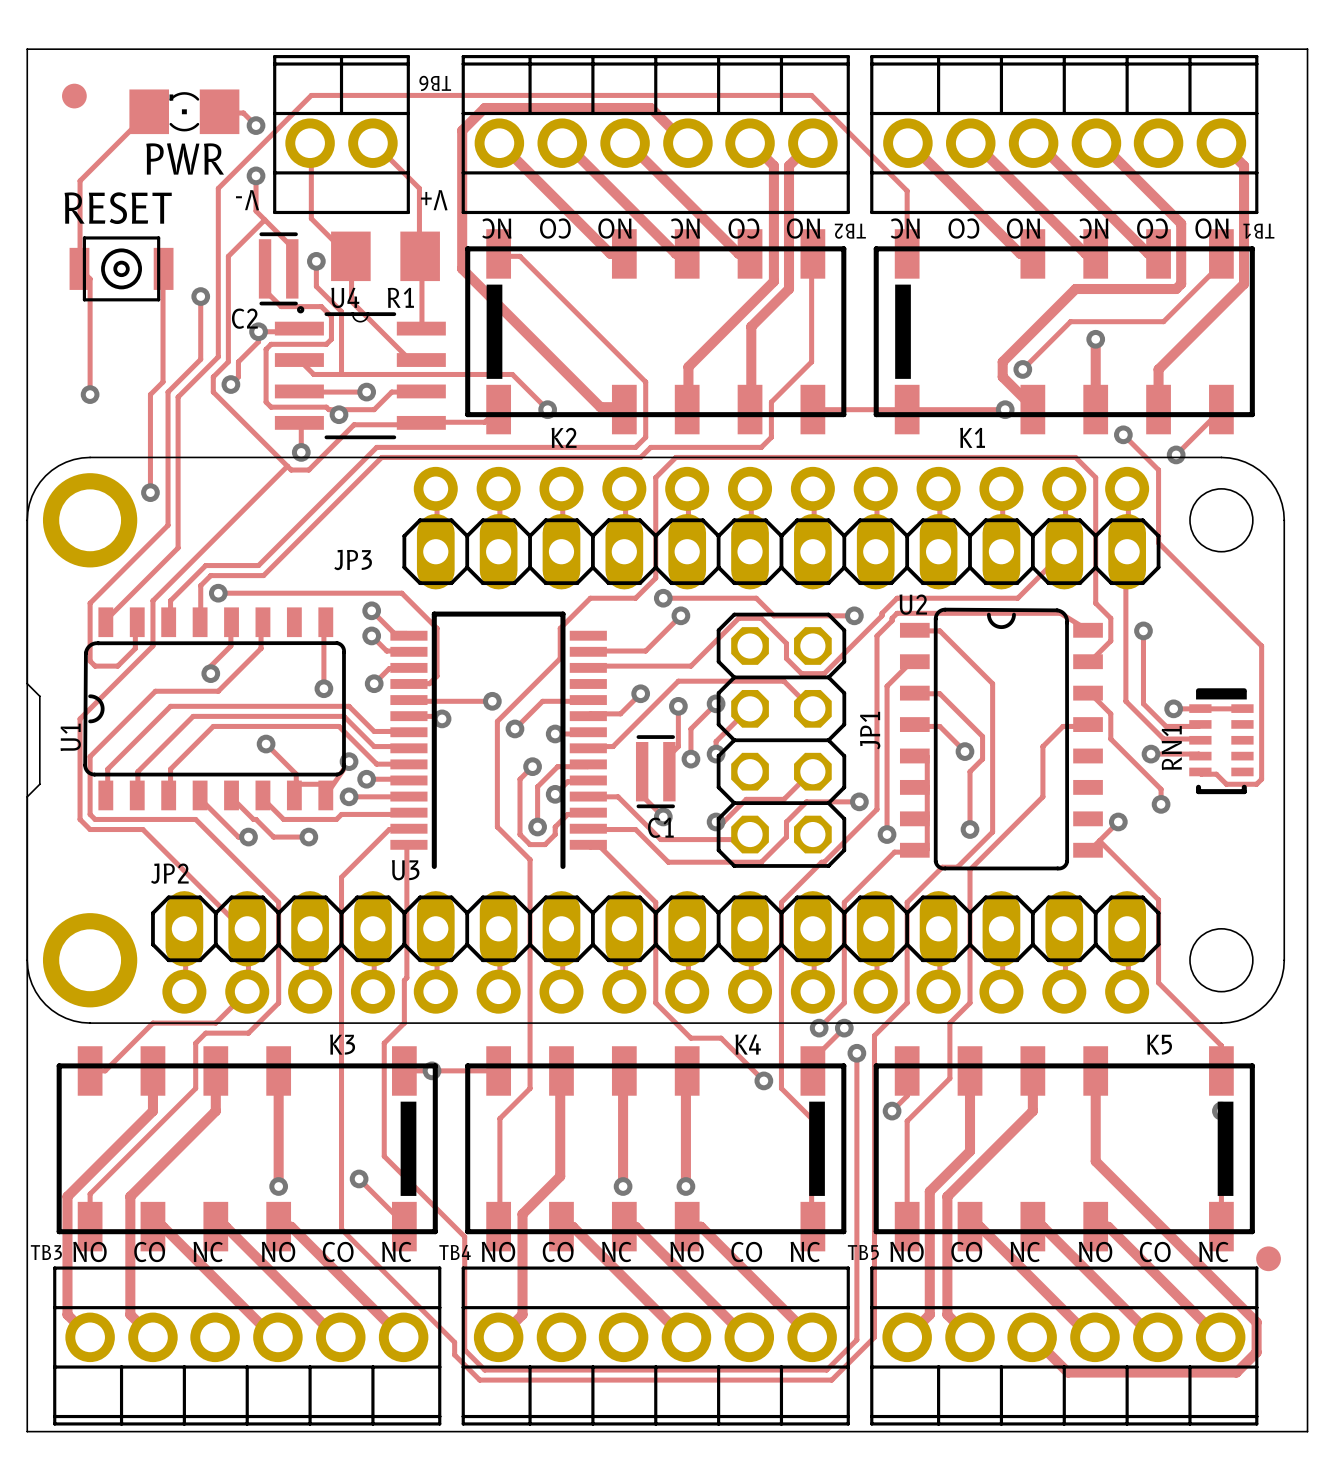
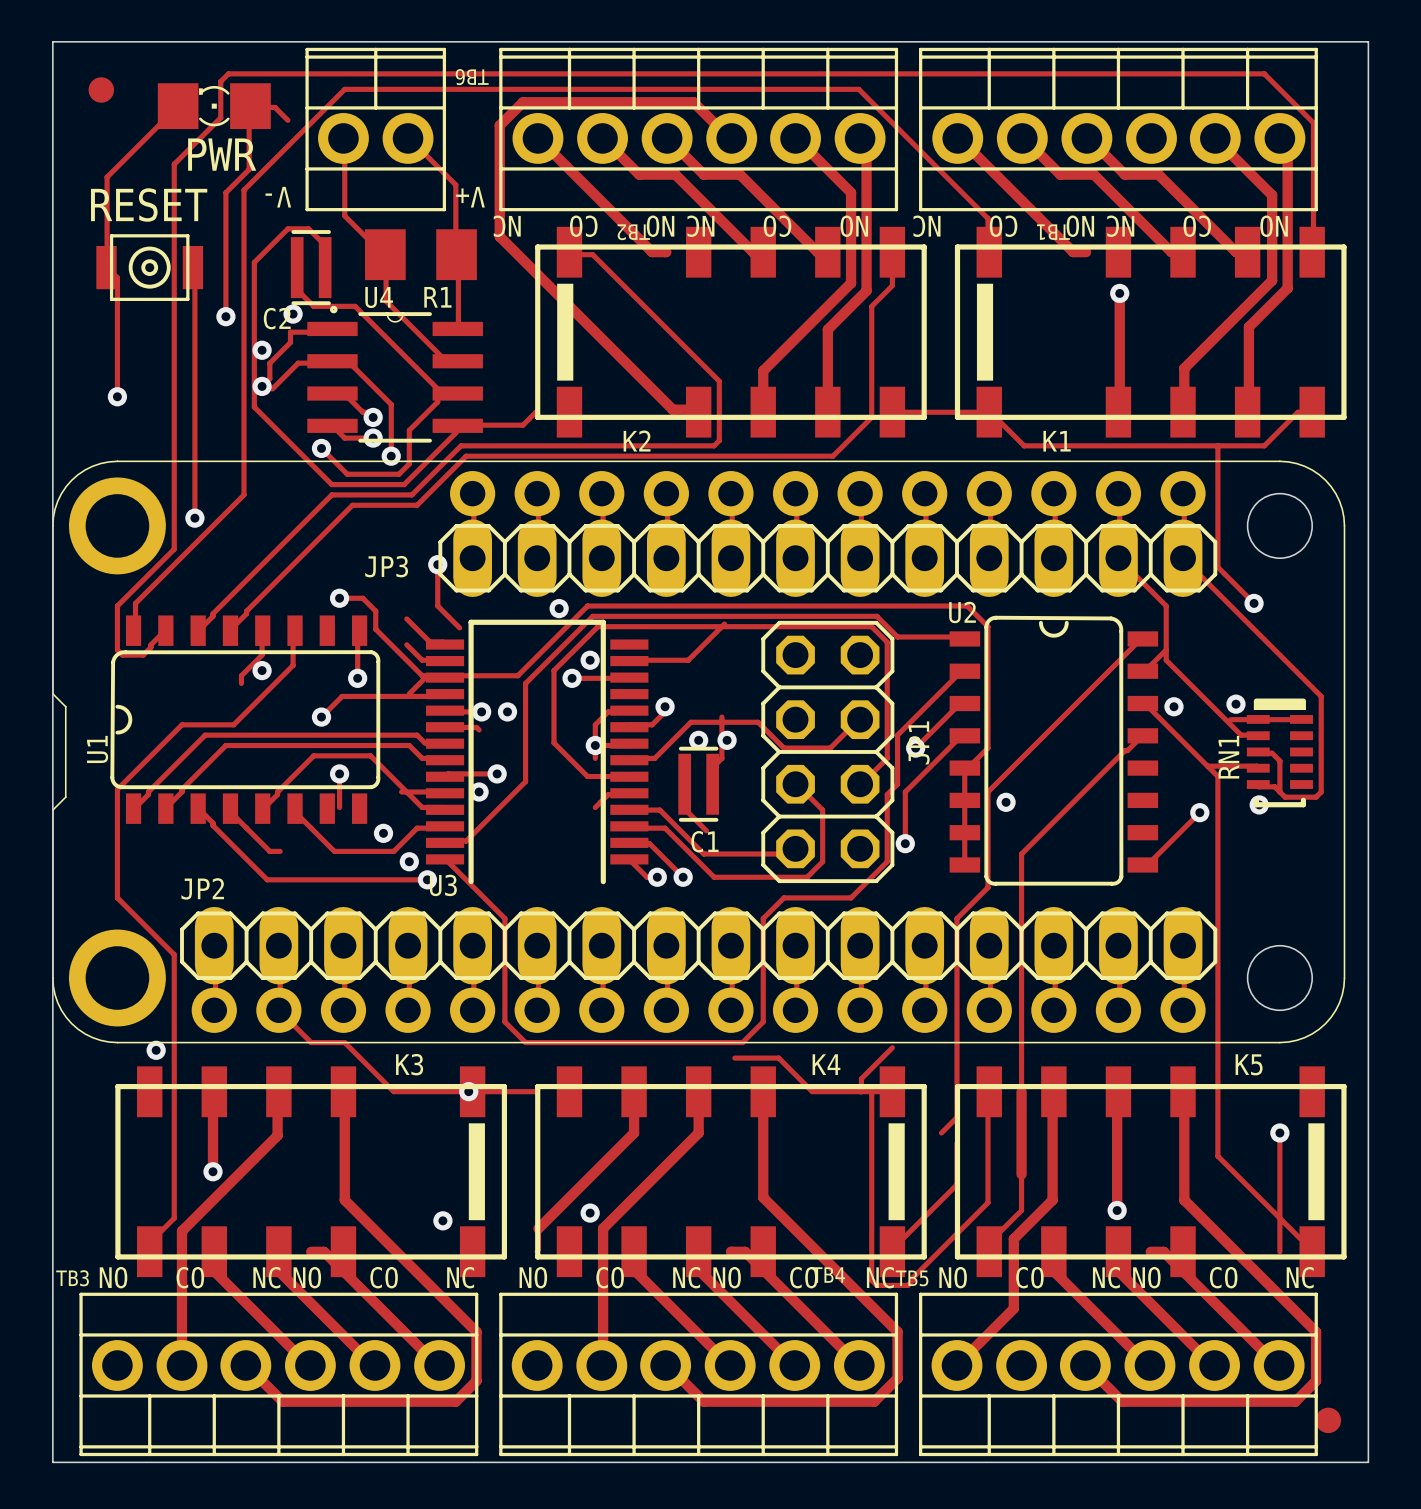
track: none -> (249, 107) (249, 169) (225, 192) (225, 316)
via: (256, 125) -> none
track: (562, 143) (565, 143) (675, 253) (687, 253) -> (603, 138) (639, 174) (675, 174) (752, 252) (763, 252)
track: (625, 143) (628, 143) (738, 253) (750, 253) -> (667, 138) (703, 174) (739, 174) (817, 252) (827, 252)
track: (812, 143) (789, 165) (789, 289) (751, 326) (750, 409) -> (860, 138) (866, 143) (866, 290) (827, 329) (827, 412)
track: (972, 143) (975, 143) (1085, 253) (1095, 253) -> (1024, 138) (1060, 174) (1093, 174) (1171, 252) (1183, 252)
track: (1035, 143) (1037, 143) (1148, 253) (1158, 253) -> (1088, 138) (1124, 174) (1158, 174) (1235, 252) (1247, 252)
track: (1096, 143) (1100, 143) (1181, 223) (1181, 283) (1176, 289) (1075, 289) (1002, 361) (1002, 377) (1032, 407) (1032, 409) -> none
track: none -> (1215, 138) (1272, 195) (1272, 280) (1184, 368) (1183, 412)
track: (1228, 150) (1244, 165) (1244, 283) (1158, 369) (1158, 409) -> (1287, 146) (1287, 288) (1248, 327) (1247, 412)
track: (773, 165) (773, 281) (688, 366) (687, 409) -> (820, 161) (851, 192) (851, 283) (763, 370) (763, 412)
track: (256, 175) (256, 211) (276, 231) -> none
via: (256, 175) -> none
track: (218, 188) (218, 356) (178, 397) (178, 547) (107, 618) -> (244, 394) (244, 494) (135, 603) (135, 626)
track: (907, 190) (907, 253) -> (956, 187) (987, 218) (989, 252)
track: (264, 219) (228, 256) (228, 361) (213, 377) -> (249, 184) (244, 190) (244, 378)
TB2 name position: TB2 (850, 231) -> TB2 (633, 232)
TB1 name position: TB1 (1258, 231) -> TB1 (1053, 232)
track: (462, 238) (462, 268) (600, 407) (623, 407) (624, 409) -> (499, 236) (672, 409) (698, 409) (698, 412)
track: (498, 253) (499, 256) (520, 256) (645, 382) (645, 437) (635, 447) (376, 447) (258, 565) (205, 565) (170, 600) (170, 630) (168, 622) -> (569, 252) (569, 254) (592, 254) (719, 381) (719, 440) (714, 445) (460, 445) (411, 494) (331, 494) (198, 630)
track: (812, 253) (811, 361) (771, 402) (771, 437) (761, 447) (650, 447) (640, 457) (381, 457) (263, 575) (210, 575) (200, 585) (200, 630) (200, 622) -> (892, 252) (892, 285) (871, 306) (871, 417) (832, 456) (466, 456) (417, 505) (352, 505) (246, 611) (246, 613) (230, 630)
track: (1221, 253) (1221, 263) (1163, 321) (1070, 321) (1022, 369) -> none
track: (316, 261) (316, 286) (341, 311) (341, 374) -> none
via: (316, 261) -> none
track: (163, 268) (163, 382) (150, 394) (150, 492) -> (192, 267) (194, 267) (194, 518)
track: none -> (1119, 293) (1118, 412)
via: none -> (1119, 293)
track: (200, 296) (200, 359) (168, 392) (168, 525) (90, 603) -> (1312, 252) (1313, 122) (1264, 73) (228, 73) (220, 81) (220, 117) (174, 164) (174, 549) (117, 606) (117, 611)
via position: (200, 296) -> (225, 316)
track: (331, 316) (331, 339) (326, 344) (271, 344) (266, 349) (266, 402) (271, 407) (326, 407) -> (365, 316) (440, 391) (455, 391) (457, 393) (437, 391) (437, 401) (409, 430) (409, 463) (399, 474) (347, 474) (321, 448)
via position: (258, 331) -> (293, 314)
K2 position: (655, 331) -> (730, 332)
K1 position: (1064, 331) -> (1150, 332)
track: (1095, 339) (1095, 409) -> none
via: (1095, 339) -> none
via: none -> (262, 350)
track: none -> (332, 361) (331, 363) (298, 363) (272, 389)
track: (301, 361) (313, 374) (512, 374) (547, 409) -> (334, 363) (349, 363) (391, 404) (391, 456)
via: (1022, 369) -> none
track: (421, 391) (391, 392) (374, 409) (338, 409) (338, 414) -> none
track: (213, 392) (291, 470) (308, 470) (354, 424) (419, 424) -> (308, 228) (287, 228) (254, 262) (254, 407) (331, 484) (404, 484) (455, 432) (455, 427)
track: (311, 392) (366, 392) -> (344, 394) (360, 409)
via: (366, 392) -> none
via: (547, 409) -> none
track: (812, 409) (844, 409) -> none
track: (937, 409) (1005, 409) -> (987, 412) (990, 412) (1024, 445) (1264, 445) (1297, 412) (1312, 412)
via: (1005, 409) -> none
track: (1221, 409) (1176, 454) -> none
track: (301, 424) (301, 452) -> (334, 427) (344, 438) (373, 438)
via: none -> (373, 438)
track: (1123, 434) (1158, 470) (1158, 542) (1261, 645) (1261, 686) -> none
via: (1123, 434) -> none
track: none -> (1217, 445) (1217, 567) (1254, 603)
via position: (301, 452) -> (321, 448)
via: none -> (391, 456)
via: (1176, 454) -> none
track: (287, 466) (152, 600) (152, 645) (80, 718) (80, 819) (90, 829) (142, 829) (240, 927) (247, 928) -> none
via position: (150, 492) -> (194, 518)
track: (1064, 551) (1017, 598) (917, 598) -> (1118, 558) (1166, 606) (1166, 626)
track: (1127, 551) (1125, 701) (1163, 739) (1200, 740) -> (1183, 558) (1321, 696)
track: none -> (437, 564) (437, 606) (459, 627)
via: none -> (437, 564)
track: none -> (339, 598) (362, 598) (375, 611) (375, 629) (422, 675) (442, 675) (445, 677) (445, 675) (517, 675) (587, 606) (631, 606)
via: none -> (339, 598)
track: (218, 593) (401, 593) (437, 628) (437, 676) (429, 683) (408, 683) -> (321, 717) (342, 696) (442, 696) (445, 694)
via: (218, 593) -> none
via: none -> (1254, 603)
track: (590, 598) (560, 628) (560, 658) (497, 721) (497, 827) (530, 859) (530, 1088) (499, 1118) (499, 1204) -> (634, 1091) (634, 1133) (538, 1228)
track: (635, 598) (655, 578) (655, 477) (675, 457) (1075, 457) (1095, 477) (1095, 603) (1110, 618) -> (677, 606) (706, 606)
via: (663, 598) -> none
track: (756, 598) (773, 615) (854, 615) -> none
track: (897, 598) (824, 673) (801, 673) (786, 658) (786, 643) (761, 618) -> (946, 606) (801, 606)
track: none -> (967, 606) (987, 626) (987, 748) (967, 768) (964, 768) (964, 864)
via: none -> (559, 608)
via: (371, 610) -> none
via: (680, 615) -> none
via: (854, 615) -> none
track: (738, 618) (690, 666) (590, 666) (588, 667) -> (783, 626) (597, 626) (553, 670) (553, 742) (587, 776) (629, 776)
track: (137, 622) (135, 648) (117, 666) (95, 666) (90, 661) (90, 640) -> (165, 630) (143, 655) (122, 655) (117, 649)
track: (914, 630) (939, 630) (992, 683) (992, 832) (957, 867) (942, 867) (937, 872) -> none
track: (1088, 630) (1060, 613) (897, 613) (876, 635) (876, 809) (839, 847) -> (1142, 638) (987, 792) (987, 887)
track: (1143, 630) (1143, 703) (1166, 726) (1198, 726) (1200, 724) -> (1166, 649) (1166, 660) (1241, 735) (1258, 735)
via: (1143, 630) -> none
via: (371, 635) -> none
track: (261, 648) (218, 691) (155, 691) (90, 756) (90, 776) -> (293, 657) (293, 665) (233, 724) (182, 724) (117, 789)
via: none -> (590, 660)
track: none -> (629, 677) (572, 678)
track: (323, 668) (323, 688) -> none
via: none -> (357, 678)
via: none -> (572, 678)
via position: (210, 673) -> (262, 670)
via: (374, 683) -> none
track: (887, 686) (887, 834) -> (936, 696) (897, 735) (897, 784) (887, 794) (887, 861)
via: (323, 688) -> none
track: (640, 693) (620, 713) (610, 713) -> (665, 706) (665, 711) (652, 724)
via position: (640, 693) -> (665, 706)
track: (914, 693) (939, 693) (982, 736) (982, 759) (970, 771) (970, 829) -> (964, 703) (959, 704) (915, 748)
via: none -> (1173, 706)
track: (444, 701) (492, 701) -> none
via: none -> (507, 711)
via: (492, 701) -> none
track: (567, 701) (542, 701) (514, 728) -> (608, 711) (595, 724) (595, 758)
track: (716, 703) (690, 728) (690, 759) -> none
via: (716, 703) -> none
via: none -> (321, 717)
via: (678, 706) -> none
track: (750, 708) (716, 741) (716, 754) -> none
track: (811, 708) (783, 681) (678, 681) (648, 711) -> (858, 719) (830, 748) (783, 748) (758, 722) (690, 722)
via position: (1173, 708) -> (1235, 704)
track: (1110, 713) (1110, 739) (1161, 789) -> (1166, 724) (1217, 776) (1217, 802)
via position: (442, 718) -> (481, 711)
track: (914, 724) (939, 726) (964, 751) -> (964, 735) (964, 737) (959, 737) (905, 792) (905, 843)
track: (1088, 724) (1063, 726) (1042, 746) (1042, 796) (970, 869) -> (1142, 735) (1127, 750) (1124, 750) (1021, 854) (1021, 885)
via: (514, 728) -> none
via: none -> (698, 740)
via: none -> (727, 740)
track: (389, 731) (374, 731) (349, 706) (170, 706) (107, 769) (105, 795) -> (424, 742) (417, 735) (205, 735) (133, 808)
via: none -> (915, 748)
track: none -> (1258, 751) (1272, 753) (1279, 761) (1279, 792)
track: (266, 744) (296, 774) (294, 795) (296, 784) (323, 784) (325, 795) (349, 761) -> none
via: (266, 744) -> none
track: (386, 746) (374, 746) (344, 716) (193, 716) (137, 771) (137, 795) -> (422, 758) (409, 745) (225, 745) (182, 789) (182, 792) (165, 808)
via: (964, 751) -> none
via: (716, 754) -> none
via: (1151, 754) -> none
track: (914, 755) (927, 756) (927, 786) (914, 787) (927, 789) (927, 816) (914, 818) (927, 819) (927, 849) (914, 850) (924, 852) (894, 852) (844, 902) (844, 1002) (819, 1028) -> none
via: (690, 759) -> none
track: none -> (339, 773) (339, 807)
via: none -> (339, 773)
via: (349, 761) -> none
track: none -> (497, 773) (448, 773) (445, 776)
via: none -> (497, 773)
track: (408, 764) (376, 764) (338, 726) (213, 726) (170, 769) (168, 795) -> (427, 879) (267, 879) (198, 808)
track: (588, 764) (587, 766) (557, 766) (537, 786) (537, 827) -> none
track: (532, 766) (520, 779) (520, 834) (530, 844) (545, 844) (555, 834) (555, 827) (567, 814) (587, 814) (588, 812) -> none
via: (532, 766) -> none
track: (812, 771) (783, 799) (746, 799) (723, 821) (716, 821) -> (860, 784) (887, 758) (887, 642) (871, 626) (807, 626)
via: (366, 779) -> none
via: none -> (479, 792)
via: none -> (1006, 802)
via: none -> (1259, 804)
via: (555, 794) -> none
track: (231, 795) (233, 786) (233, 799) (273, 837) (301, 837) -> (316, 833) (334, 851)
via: (349, 796) -> none
track: (408, 796) (349, 796) -> (445, 809) (442, 807) (422, 807) (370, 755) (313, 755) (262, 808)
track: (859, 801) (806, 801) (786, 821) (786, 837) (776, 847) -> (795, 784) (822, 810) (822, 861)
via: (859, 801) -> none
track: none -> (1217, 817) (1217, 1156) (1312, 1251)
via position: (1161, 804) -> (1199, 812)
track: (90, 814) (95, 819) (195, 819) (278, 902) (278, 1002) (248, 1033) (205, 1033) (195, 1043) (195, 1088) (90, 1194) (90, 1226) -> (117, 828) (117, 897) (174, 954) (174, 1218) (151, 1241) (149, 1251)
track: (381, 814) (341, 814) (336, 819) (283, 819) -> (417, 828) (393, 851) (342, 851)
via: (663, 816) -> none
via: none -> (383, 833)
via: (716, 821) -> none
track: (1118, 821) (1090, 849) -> (1199, 812) (1148, 864) (1145, 864)
via: (1118, 821) -> none
via: (537, 827) -> none
track: (408, 828) (389, 829) (341, 877) (341, 1229) (454, 1342) (454, 1354) (479, 1380) (831, 1380) (874, 1337) (874, 1035) (907, 1002) -> (445, 842) (445, 841) (466, 841) (525, 781) (525, 683) (592, 616) (876, 616) (897, 637) (964, 637) (964, 638)
track: (607, 829) (635, 829) (668, 862) (670, 862) -> (629, 826) (631, 828) (665, 828) (714, 877)
track: none -> (649, 843) (683, 877)
via: none -> (905, 843)
via: (970, 829) -> none
via: (887, 834) -> none
via: (248, 837) -> none
via: (308, 837) -> none
track: (1099, 840) (1158, 899) (1158, 982) (1221, 1045) (1221, 1070) -> none
track: (408, 844) (406, 847) (406, 977) (404, 980) (404, 1023) (384, 1043) (384, 1156) (464, 1236) (464, 1349) (484, 1370) (826, 1370) (856, 1339) (856, 1053) -> (445, 859) (504, 918) (504, 1021) (525, 1042) (742, 1042) (763, 1021) (763, 918) (783, 897) (851, 897) (871, 877)
via: none -> (409, 861)
track: (590, 847) (600, 847) (655, 902) (655, 1002) (690, 1038) -> (631, 861) (646, 877) (657, 877)
via: none -> (657, 877)
via: none -> (683, 877)
track: (824, 862) (821, 862) (781, 902) (781, 1088) (811, 1118) (812, 1226) -> none
via: none -> (427, 879)
track: (247, 991) (215, 1023) (152, 1023) (105, 1070) (90, 1070) -> (278, 1010) (311, 1042) (344, 1042) (393, 1091) (440, 1091)
track: none -> (956, 1021) (956, 1091)
track: (970, 1002) (949, 1023) (949, 1078) (907, 1121) -> (1021, 1021) (1021, 1091)
via: (819, 1028) -> none
via: (844, 1028) -> none
via: none -> (156, 1050)
track: (721, 1038) (763, 1080) -> (765, 1058) (778, 1058) (812, 1091) (892, 1091)
via: (856, 1053) -> none
track: (152, 1070) (152, 1111) (67, 1196) (67, 1314) (90, 1337) -> none
track: none -> (214, 1091) (213, 1171)
track: (215, 1070) (215, 1111) (130, 1196) (130, 1314) (152, 1337) -> (278, 1091) (277, 1135) (182, 1231) (182, 1365)
track: (278, 1070) (278, 1186) -> none
track: none -> (343, 1091) (344, 1200) (476, 1331) (476, 1380) (455, 1401) (282, 1401) (245, 1365)
track: (561, 1070) (560, 1176) (522, 1214) (522, 1314) (499, 1337) -> none
track: (624, 1070) (623, 1186) -> none
track: none -> (698, 1091) (698, 1133) (603, 1228) (601, 1365)
track: (687, 1070) (685, 1186) -> (1118, 1091) (1117, 1210)
track: none -> (763, 1091) (763, 1197) (897, 1331) (897, 1378) (874, 1401) (703, 1401) (665, 1365)
track: none -> (871, 1091) (871, 1280) (876, 1285) (907, 1285) (913, 1277) (987, 1202) (989, 1091)
track: (1032, 1070) (1032, 1111) (947, 1196) (947, 1314) (970, 1337) -> none
track: (1095, 1070) (1095, 1161) (1256, 1322) -> (1183, 1091) (1184, 1200) (1316, 1331) (1316, 1349)
via: (763, 1080) -> none
via: (892, 1111) -> none
via: none -> (213, 1171)
K3 position: (247, 1148) -> (311, 1171)
K4 position: (655, 1148) -> (730, 1171)
K5 position: (1064, 1148) -> (1150, 1171)
track: (970, 1151) (929, 1191) (929, 1314) -> (1053, 1091) (1052, 1200) (1013, 1238) (1013, 1308) (980, 1342)
track: none -> (1021, 1174) (1021, 1210) (990, 1241) (989, 1251)
track: (907, 1161) (907, 1226) -> (956, 1184) (892, 1249) (892, 1251)
track: (359, 1178) (404, 1224) (404, 1226) -> none
via position: (359, 1178) -> (442, 1220)
via: (278, 1186) -> none
via: (623, 1186) -> none
via: (685, 1186) -> none
via: none -> (1117, 1210)
via: none -> (590, 1213)
track: (152, 1226) (163, 1226) (273, 1337) (276, 1337) -> (214, 1251) (215, 1272) (308, 1365)
track: (215, 1226) (225, 1226) (336, 1337) (338, 1337) -> (278, 1251) (280, 1272) (373, 1365)
track: (561, 1226) (572, 1226) (683, 1337) (685, 1337) -> (634, 1251) (634, 1269) (729, 1365)
track: (624, 1226) (635, 1226) (746, 1337) (748, 1337) -> (698, 1251) (698, 1269) (794, 1365)
track: (970, 1226) (980, 1226) (1090, 1337) (1093, 1337) -> (1053, 1251) (1055, 1272) (1148, 1365)
track: (1032, 1226) (1042, 1226) (1153, 1337) (1156, 1337) -> (1118, 1251) (1119, 1272) (1212, 1365)
TB4 name position: TB4 (455, 1252) -> TB4 (828, 1275)
part position: (1268, 1258) -> (1328, 1420)

